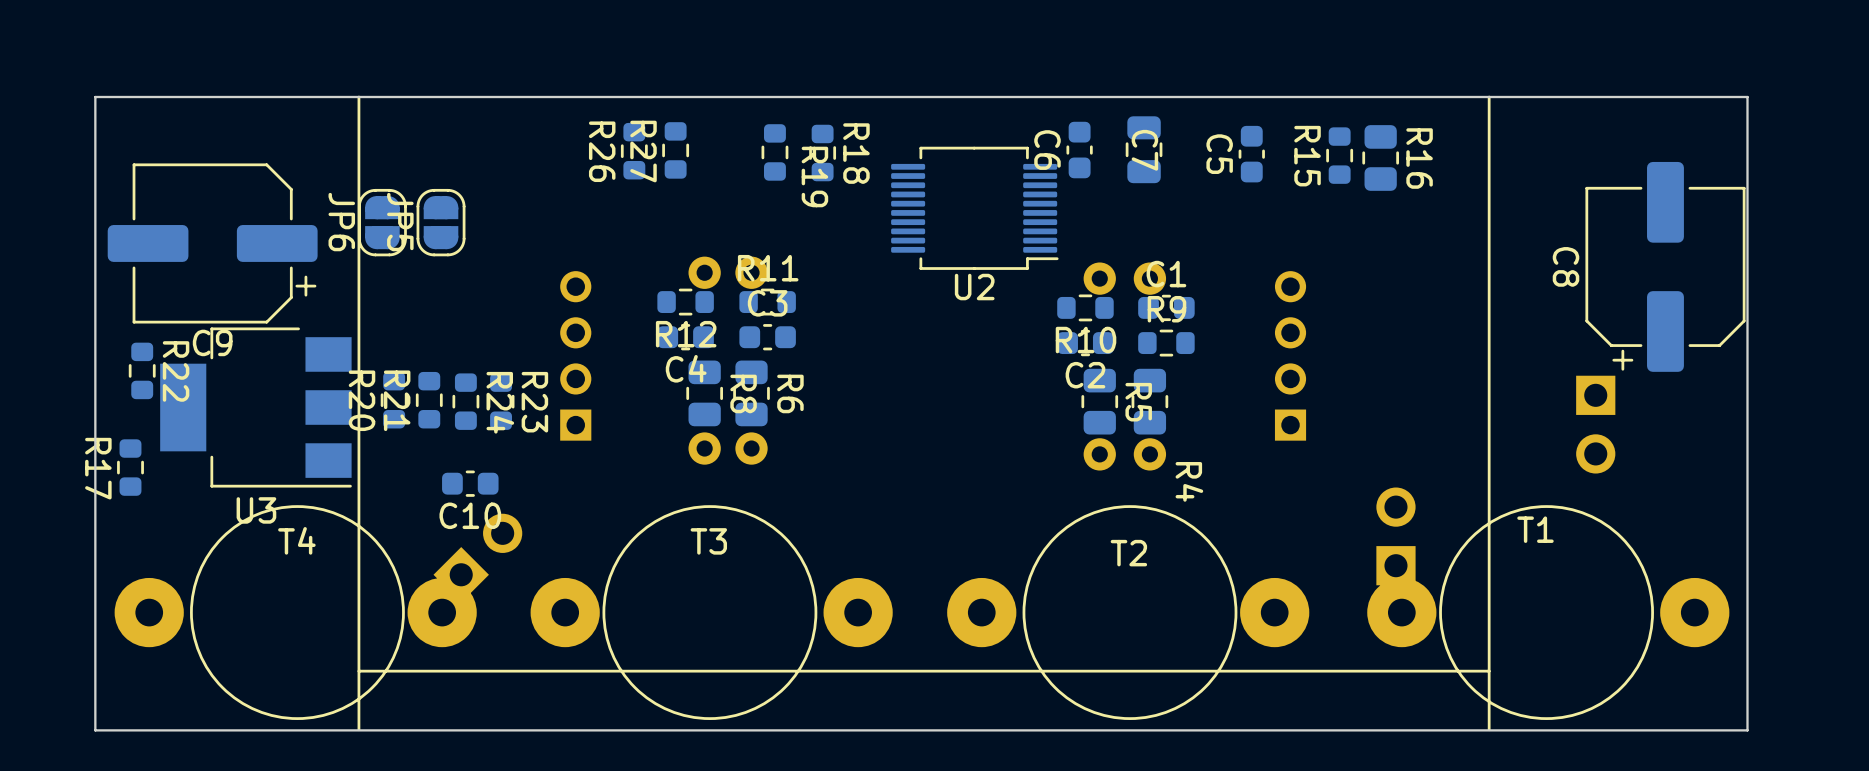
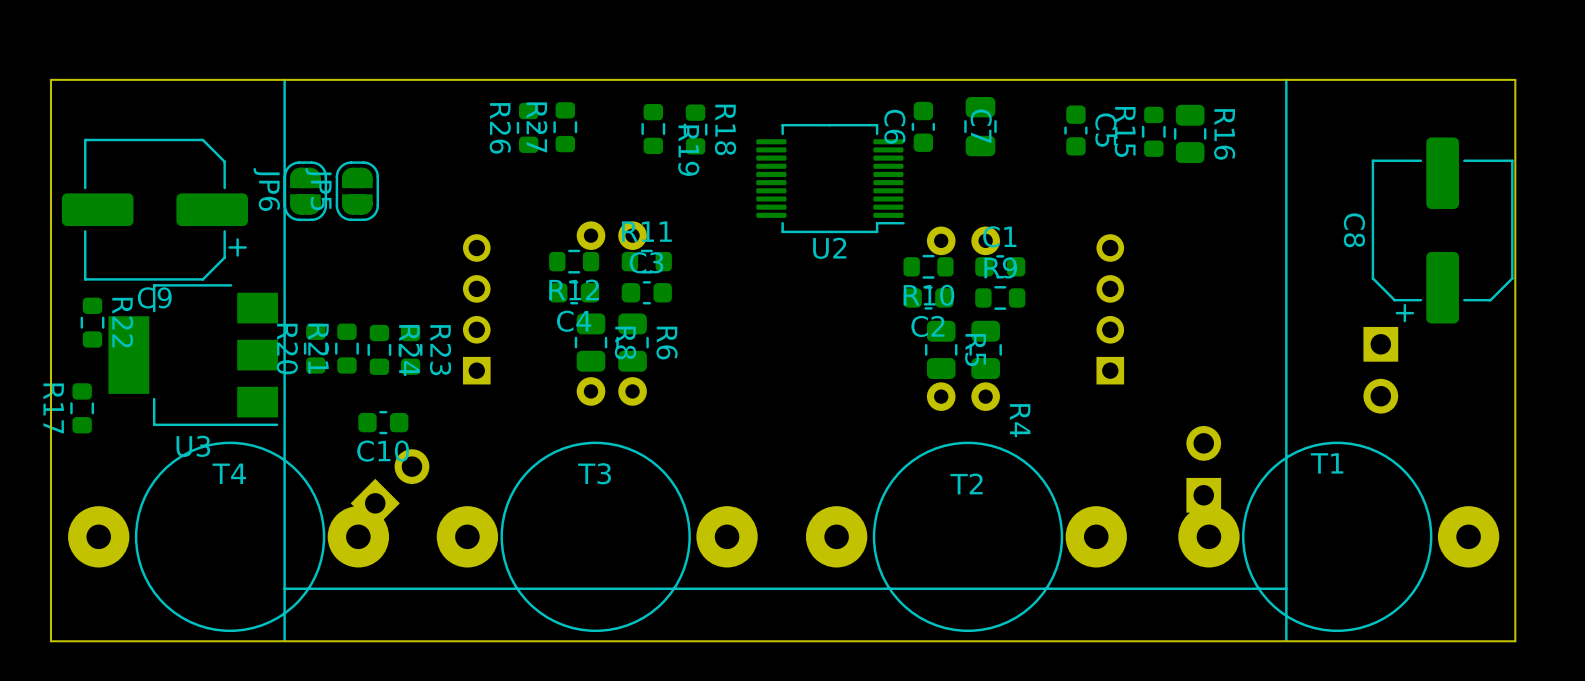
C5 name position: C5 (1219, 154) -> C5 (1105, 130)

